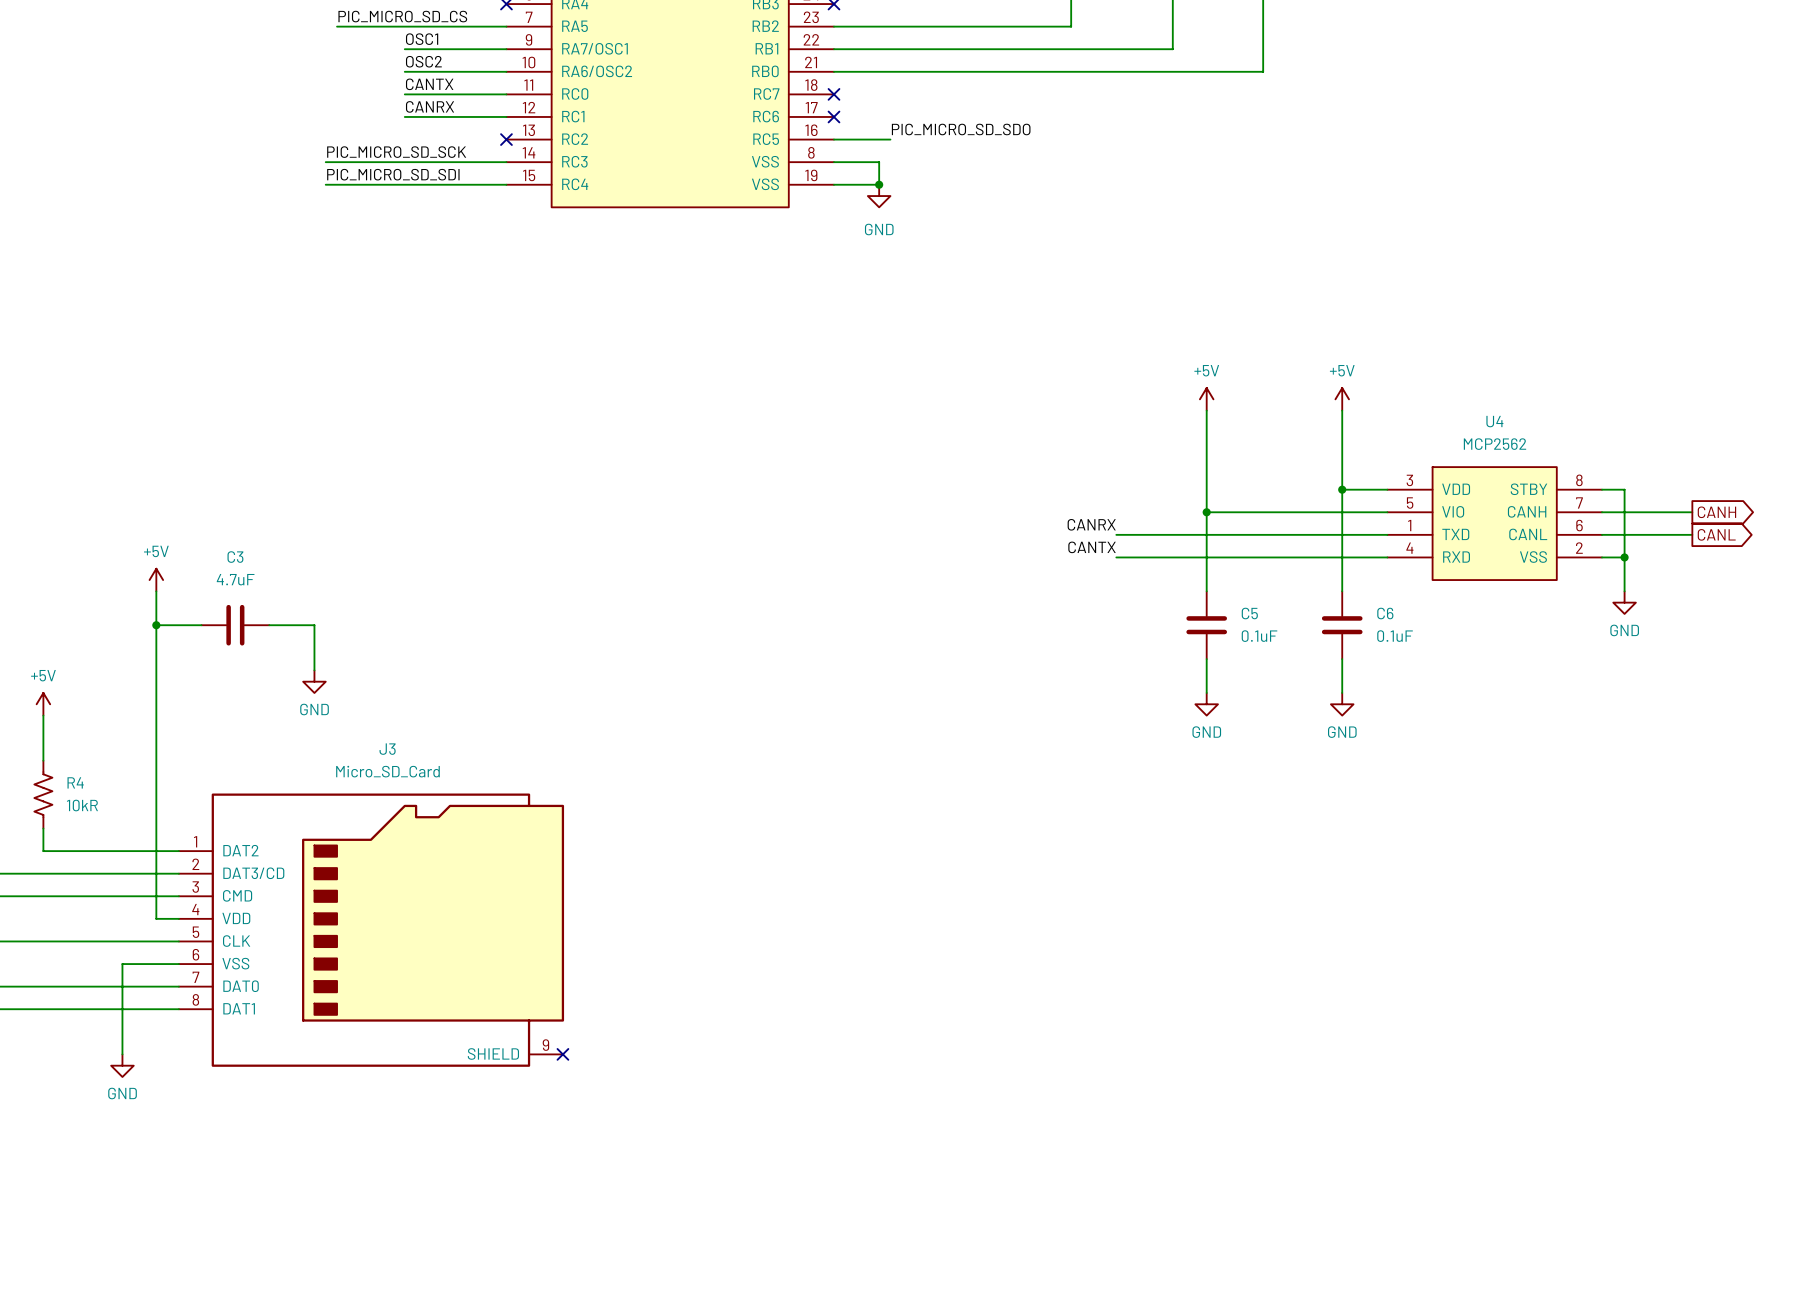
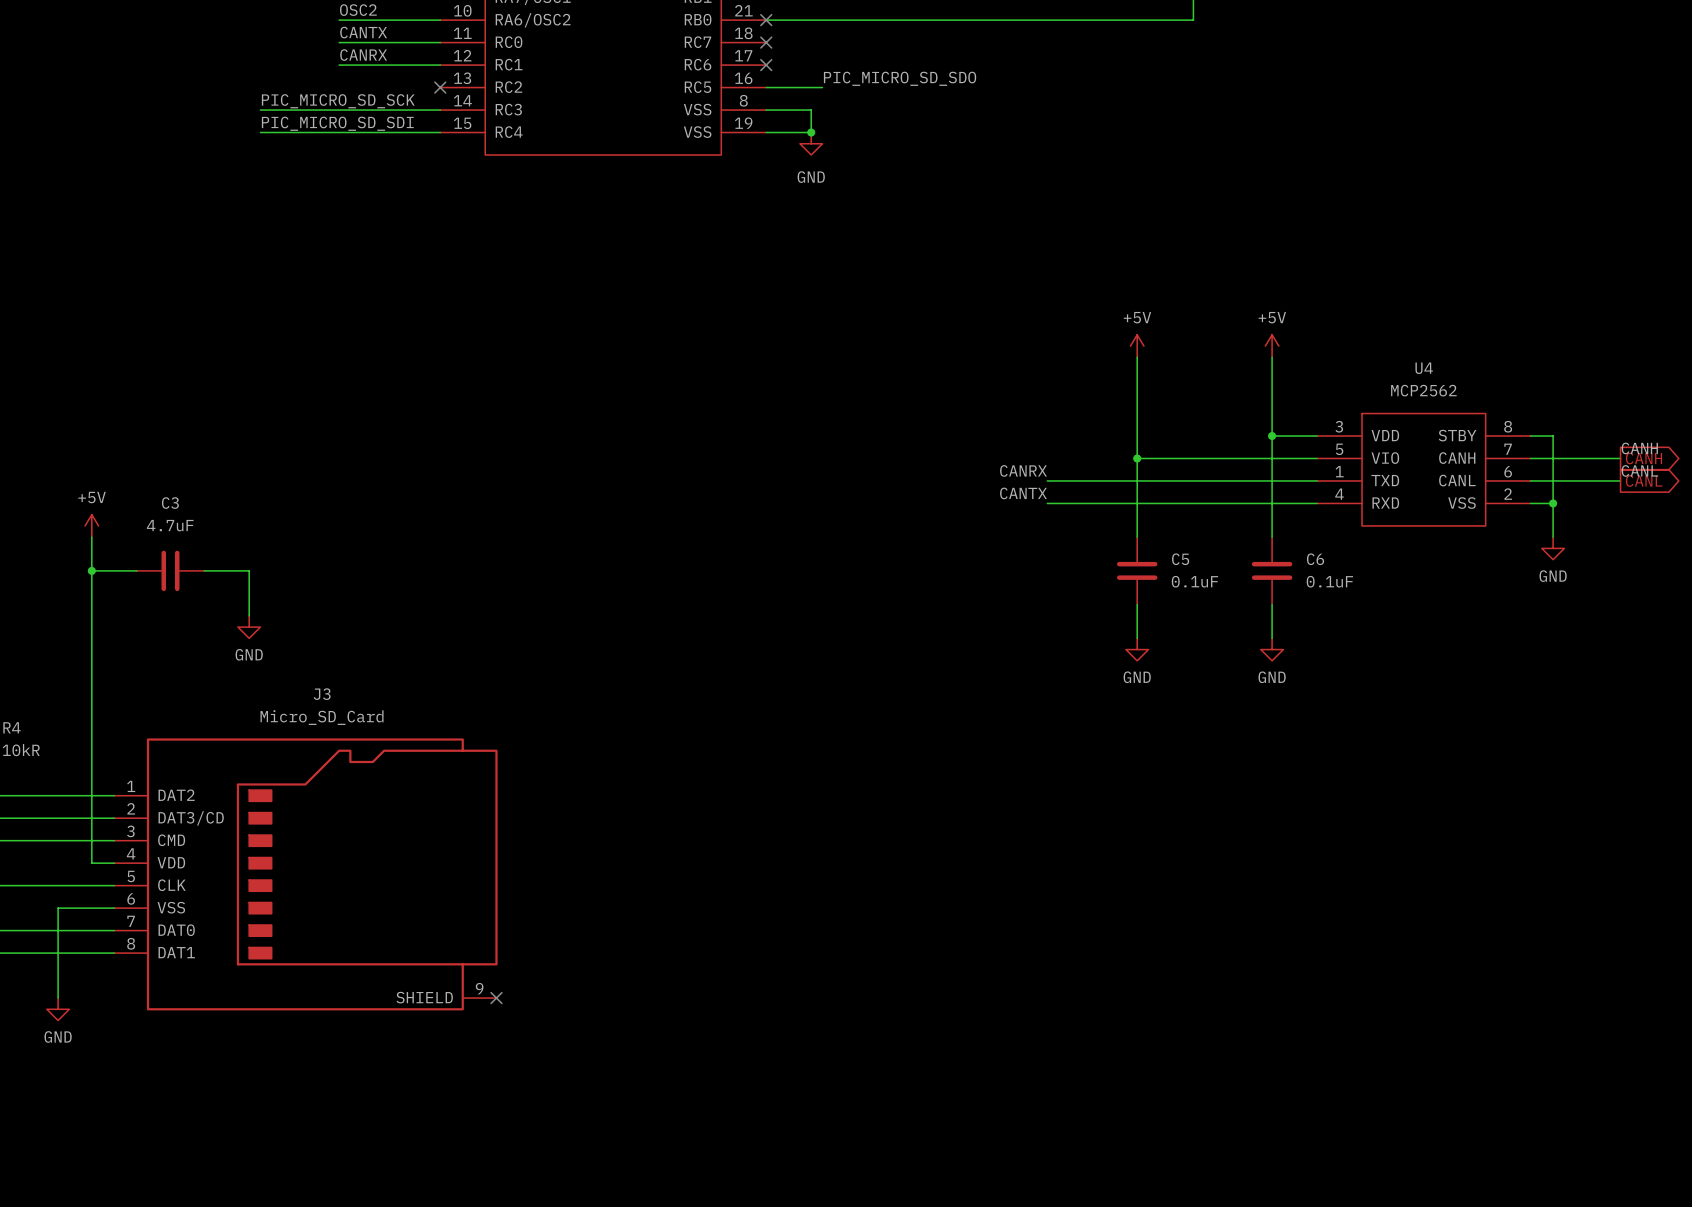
no-connect mark: none -> (766, 20)
label: none -> CANH (1639, 448)
label: none -> CANL (1639, 470)

